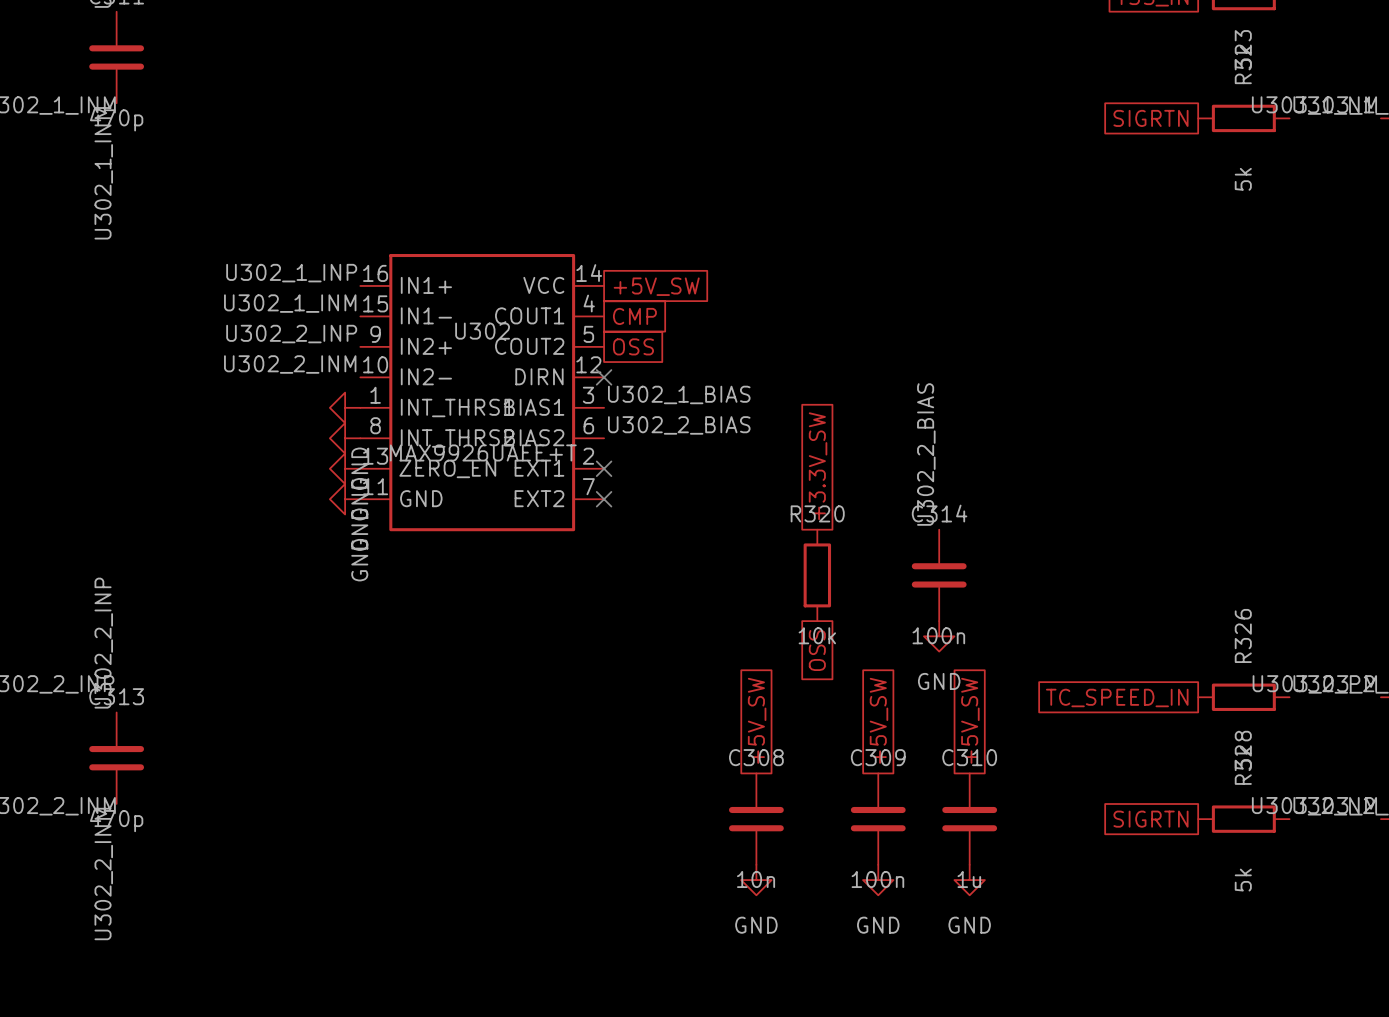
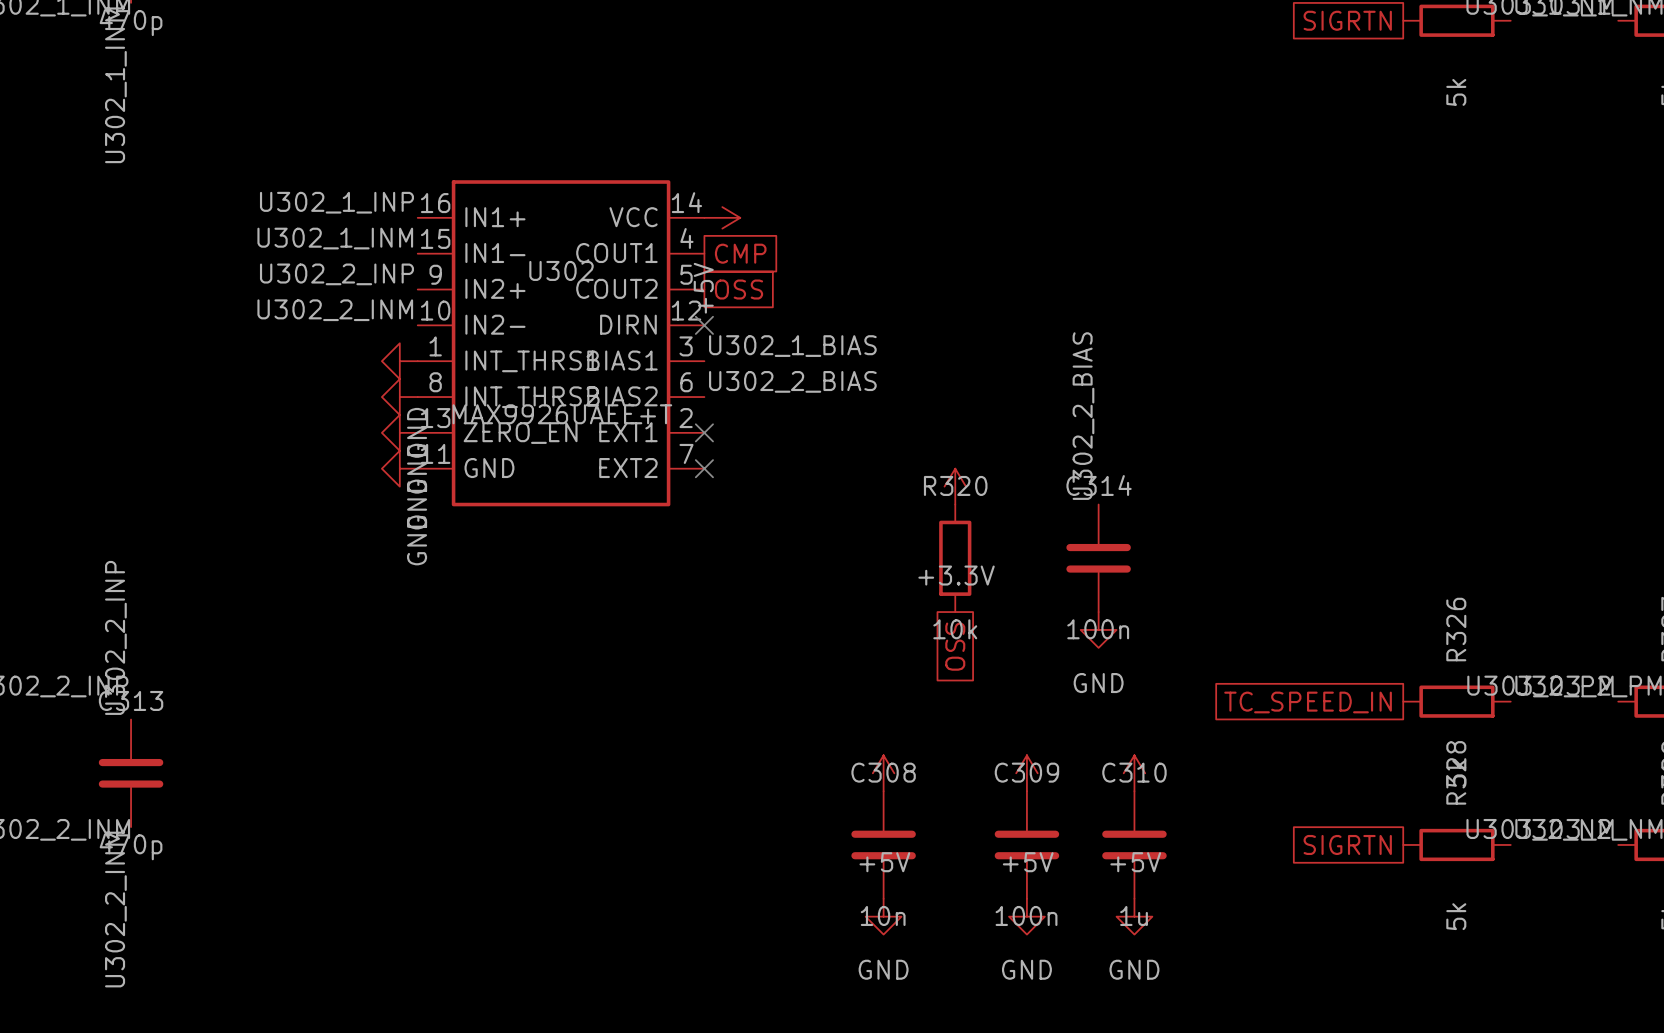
power symbol: none -> +5V (722, 217)
global label: +5V_SW (656, 286) -> none
global label: +3.3V_SW (818, 466) -> none
power symbol: none -> +3.3V (955, 486)
global label: +5V_SW (757, 720) -> none
global label: +5V_SW (878, 720) -> none
global label: +5V_SW (970, 720) -> none
power symbol: none -> +5V (883, 773)
power symbol: none -> +5V (1026, 773)
power symbol: none -> +5V (1134, 773)

